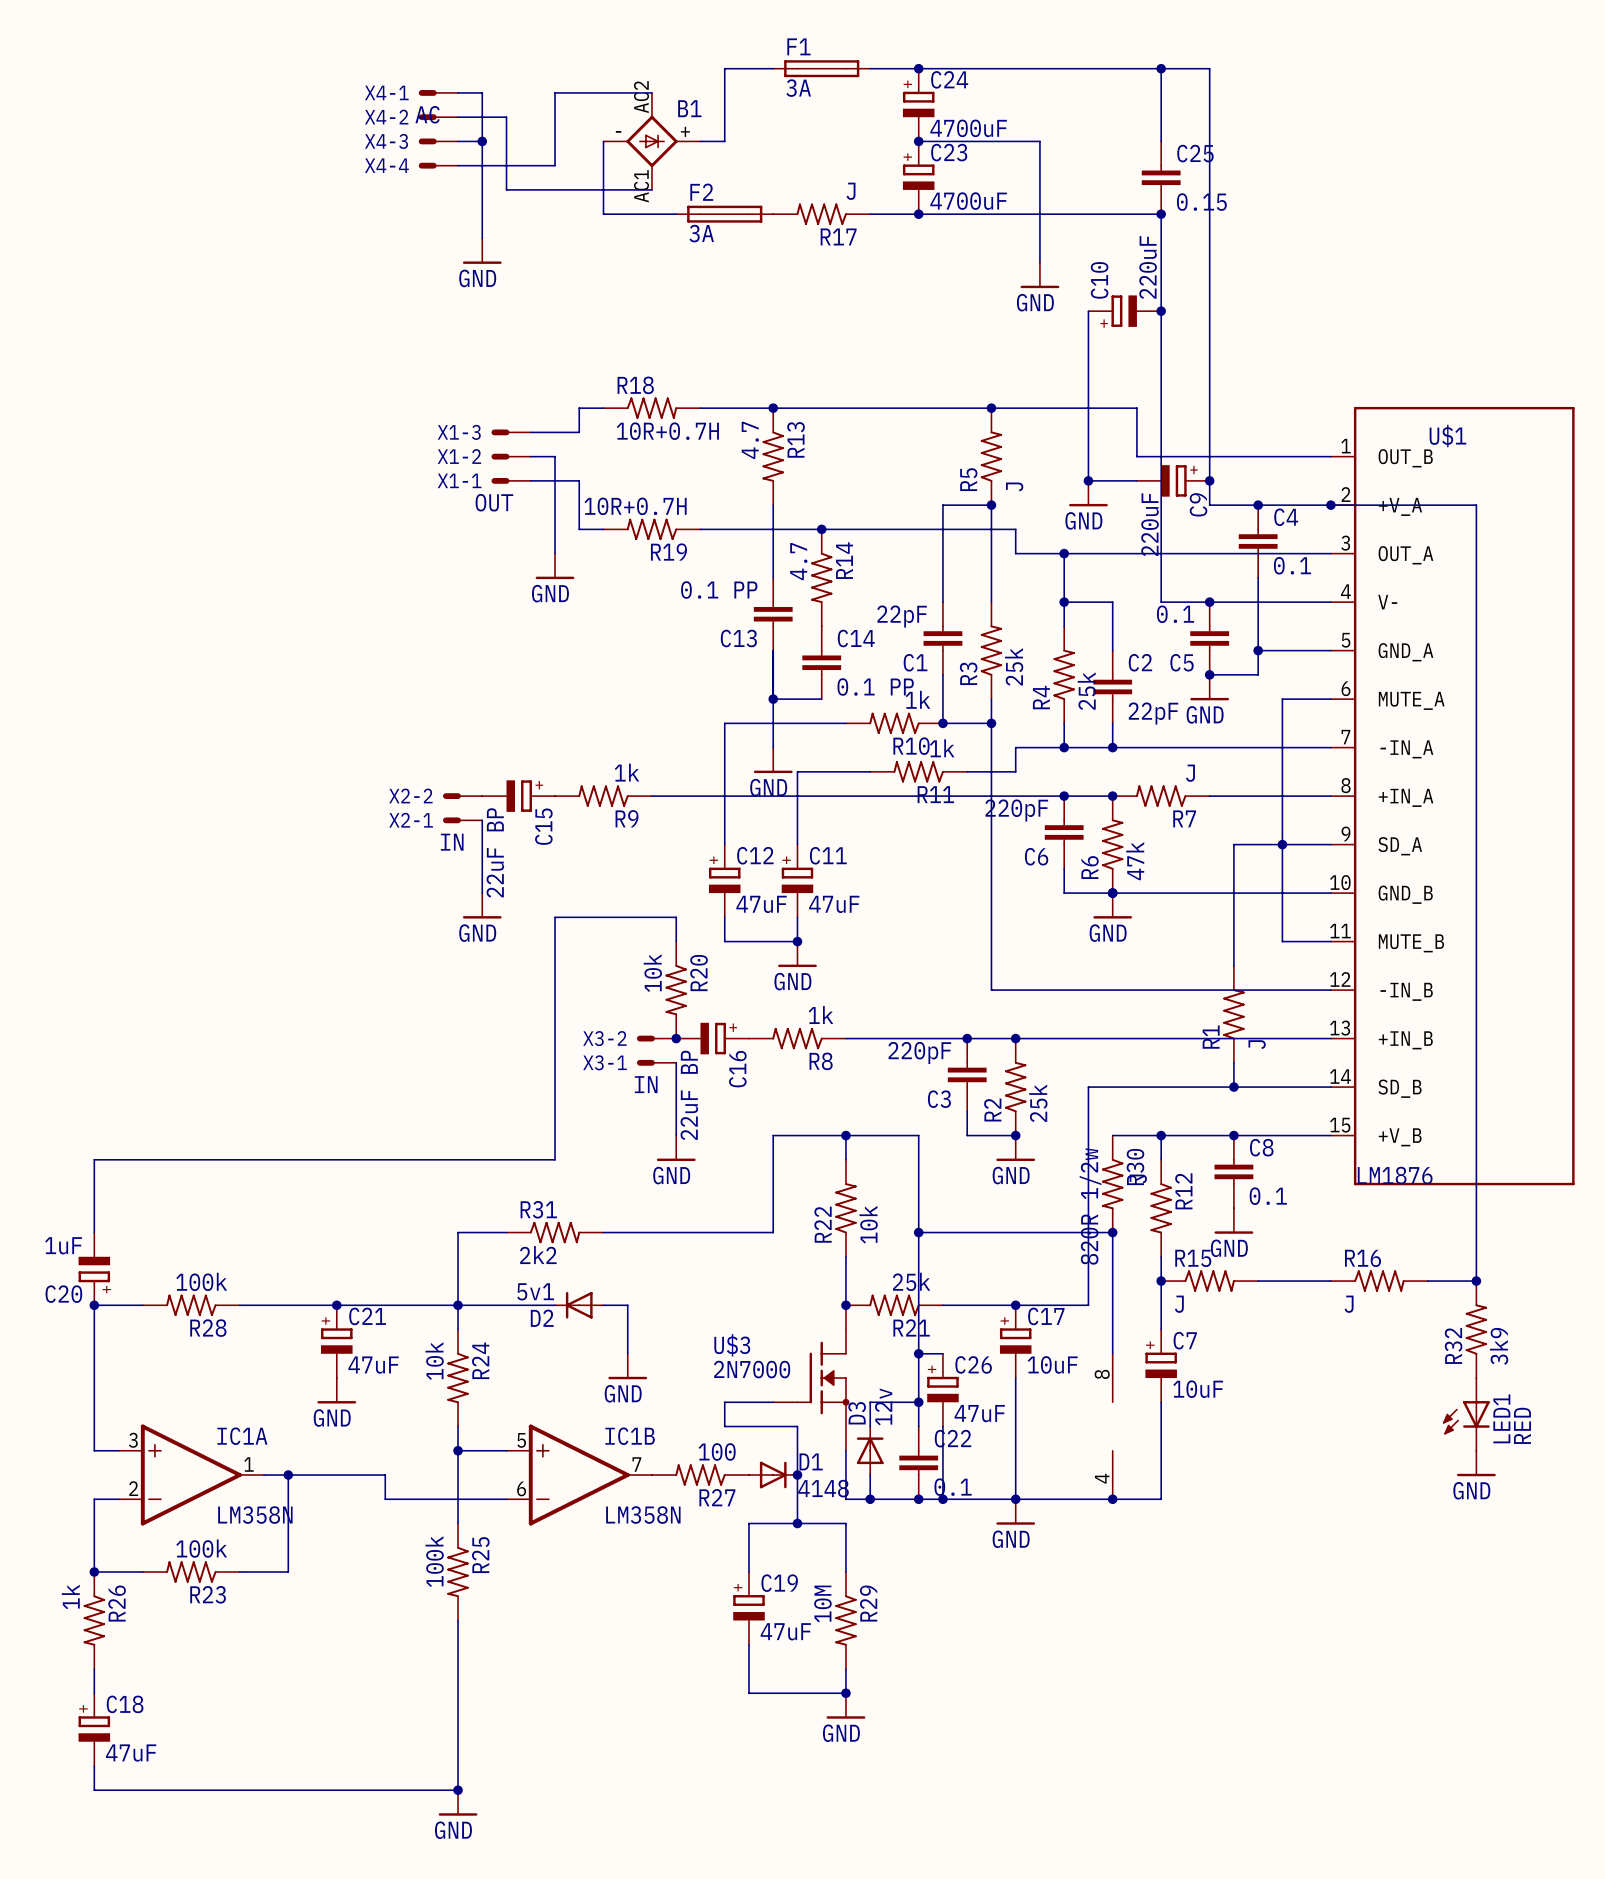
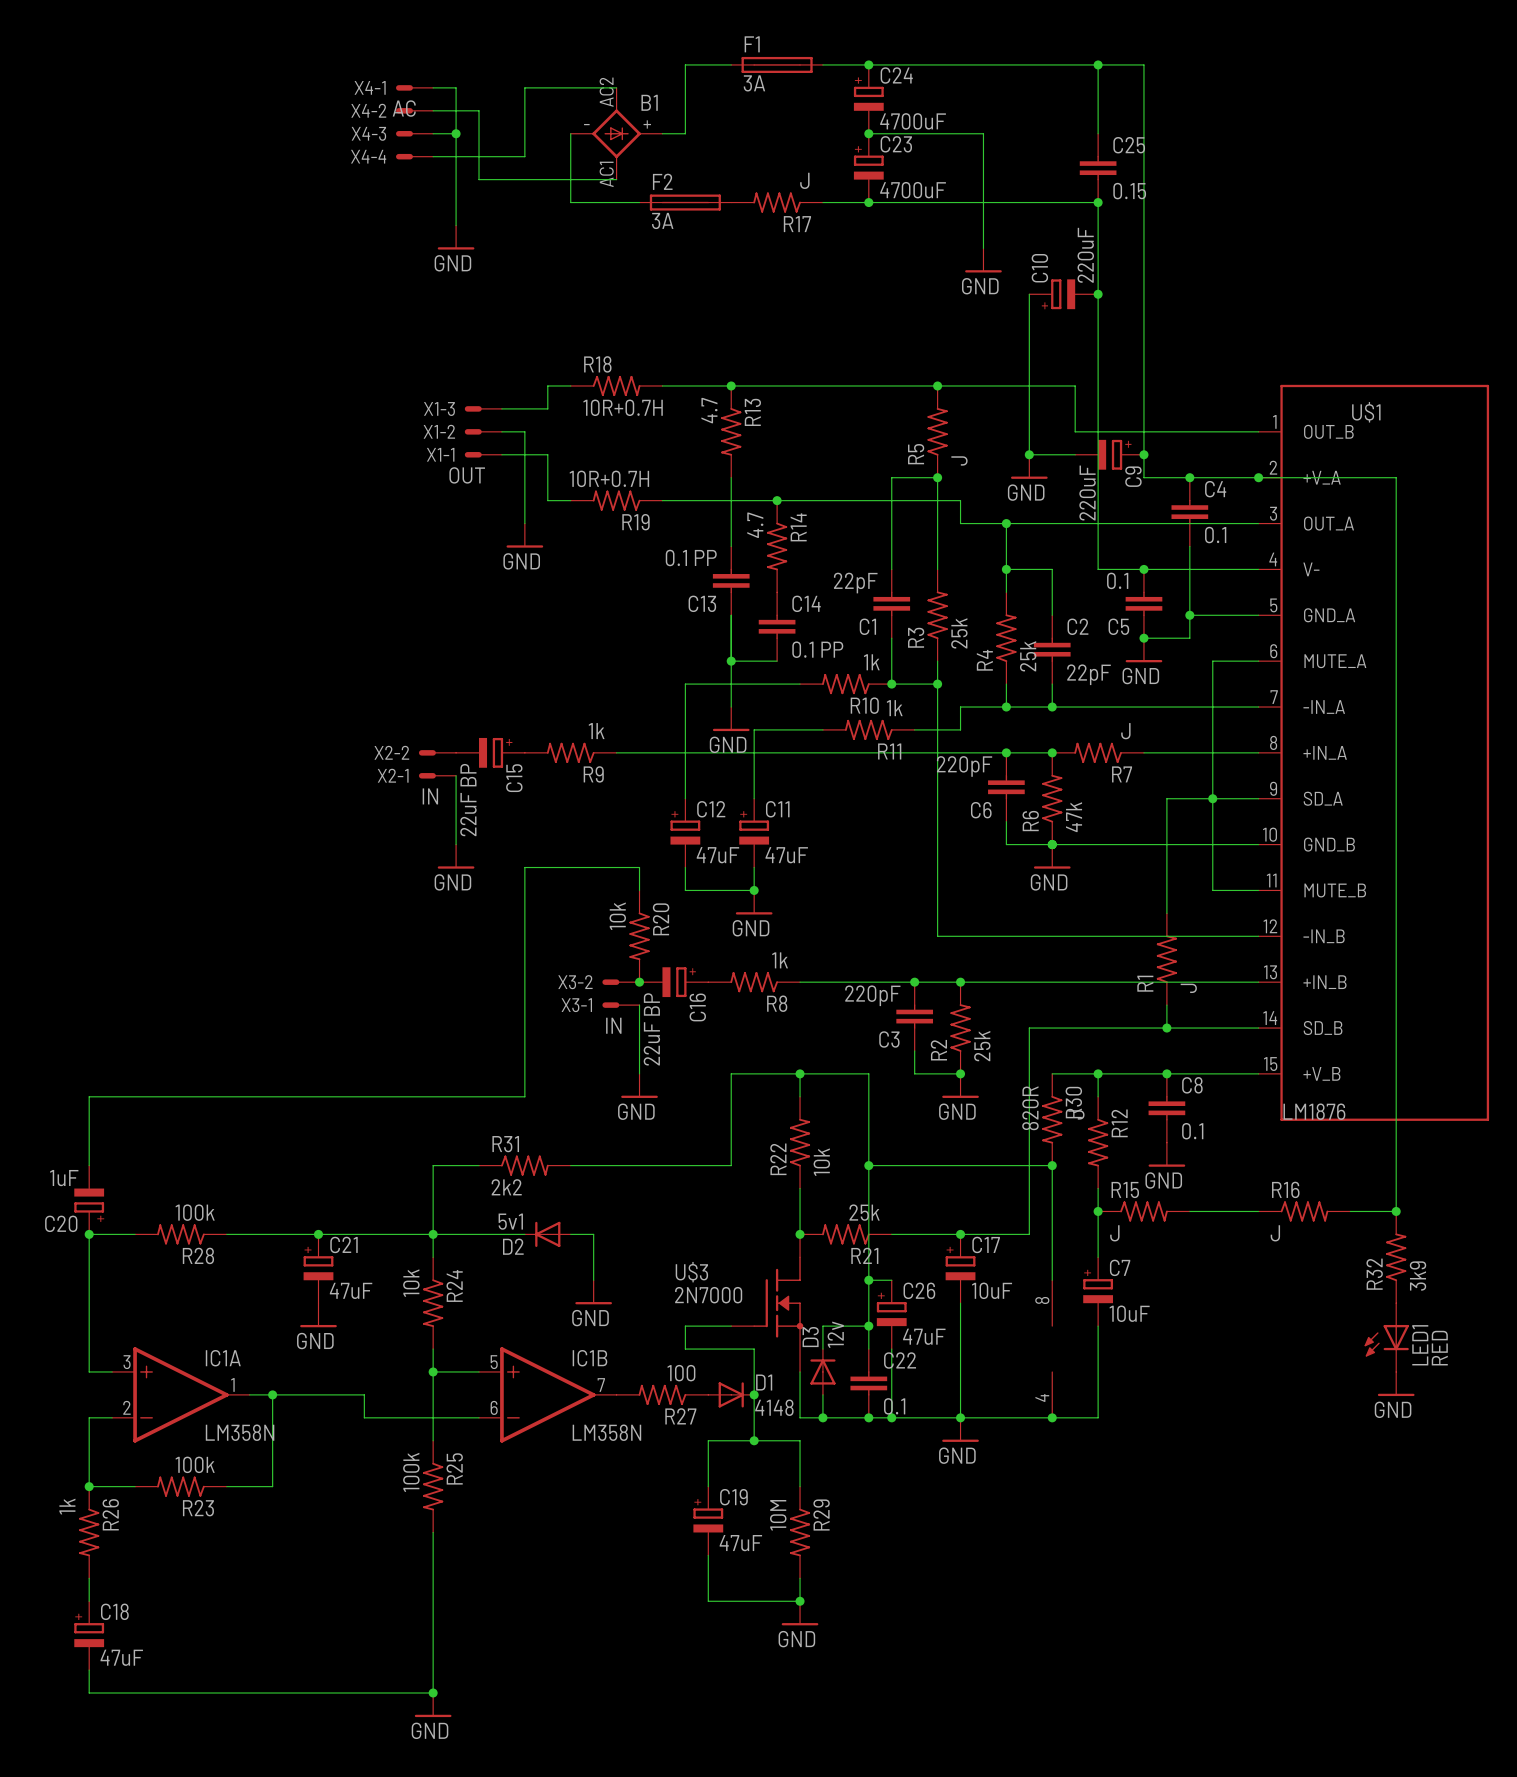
R30 value: 820R 1/2w (1090, 1206) -> 820R (1030, 1108)

